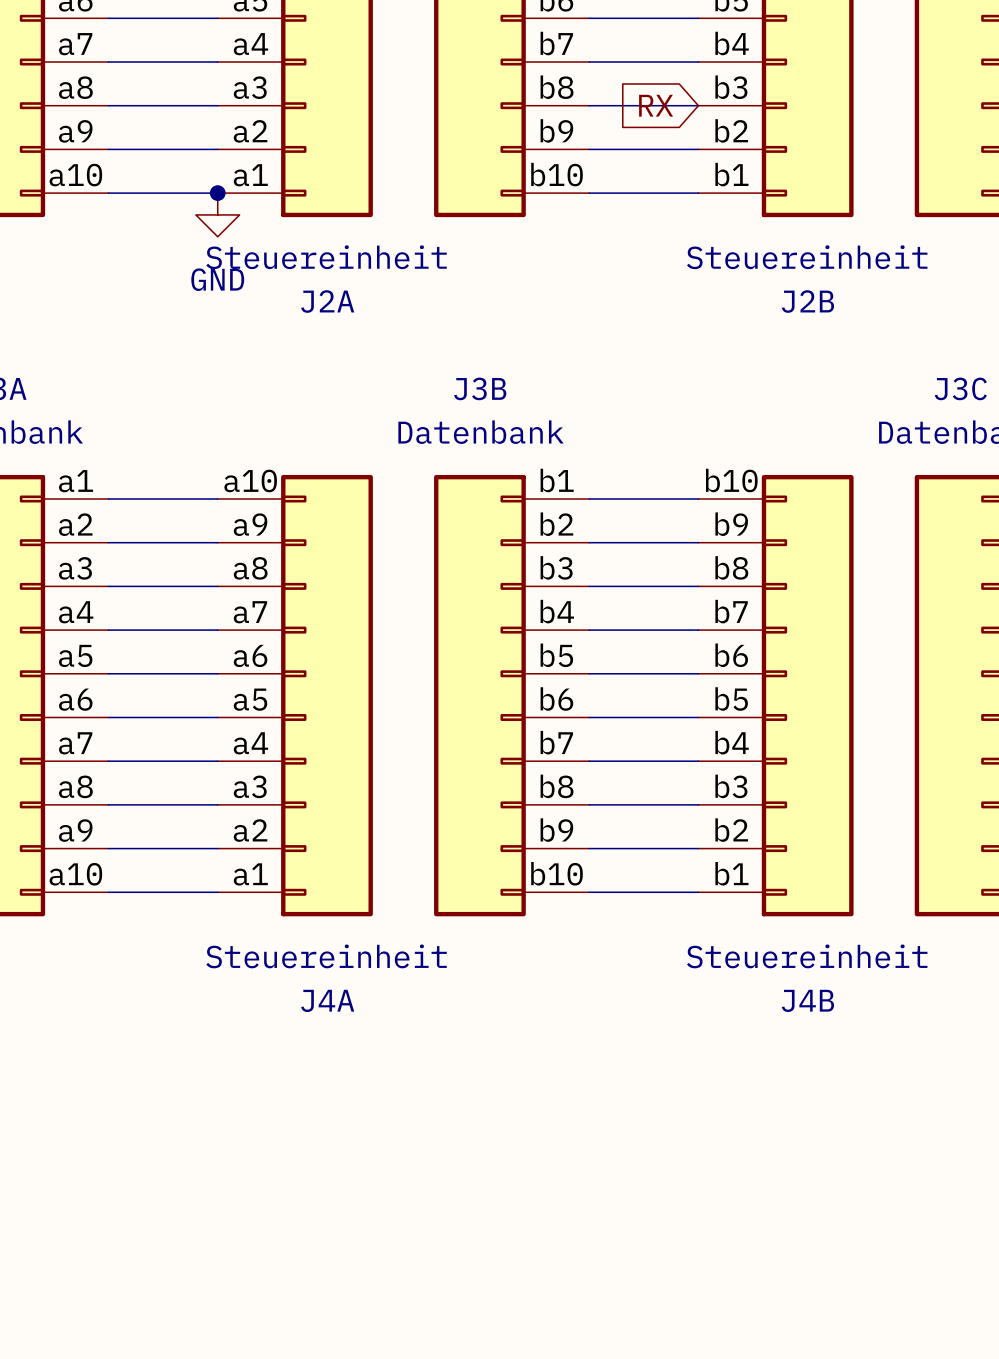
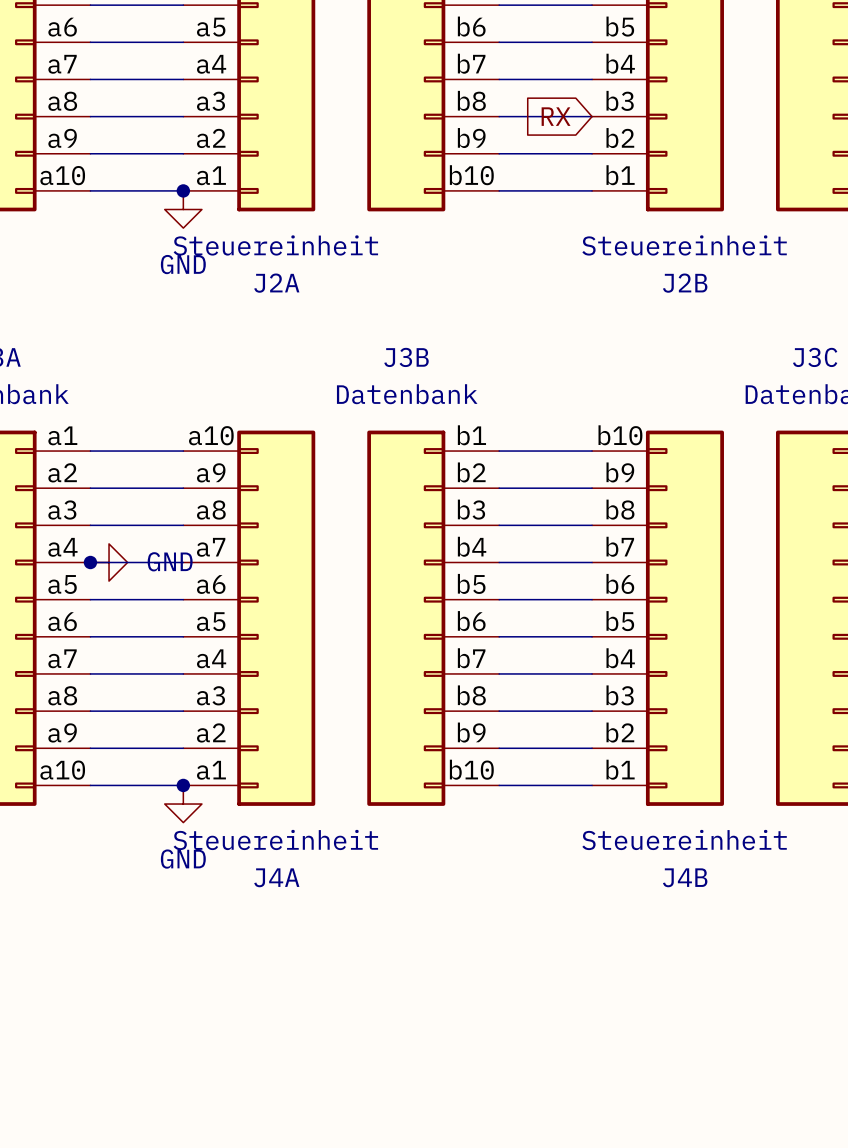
junction: none -> (90, 562)
power symbol: none -> GND (109, 562)
junction: none -> (183, 785)
power symbol: none -> GND (183, 804)

